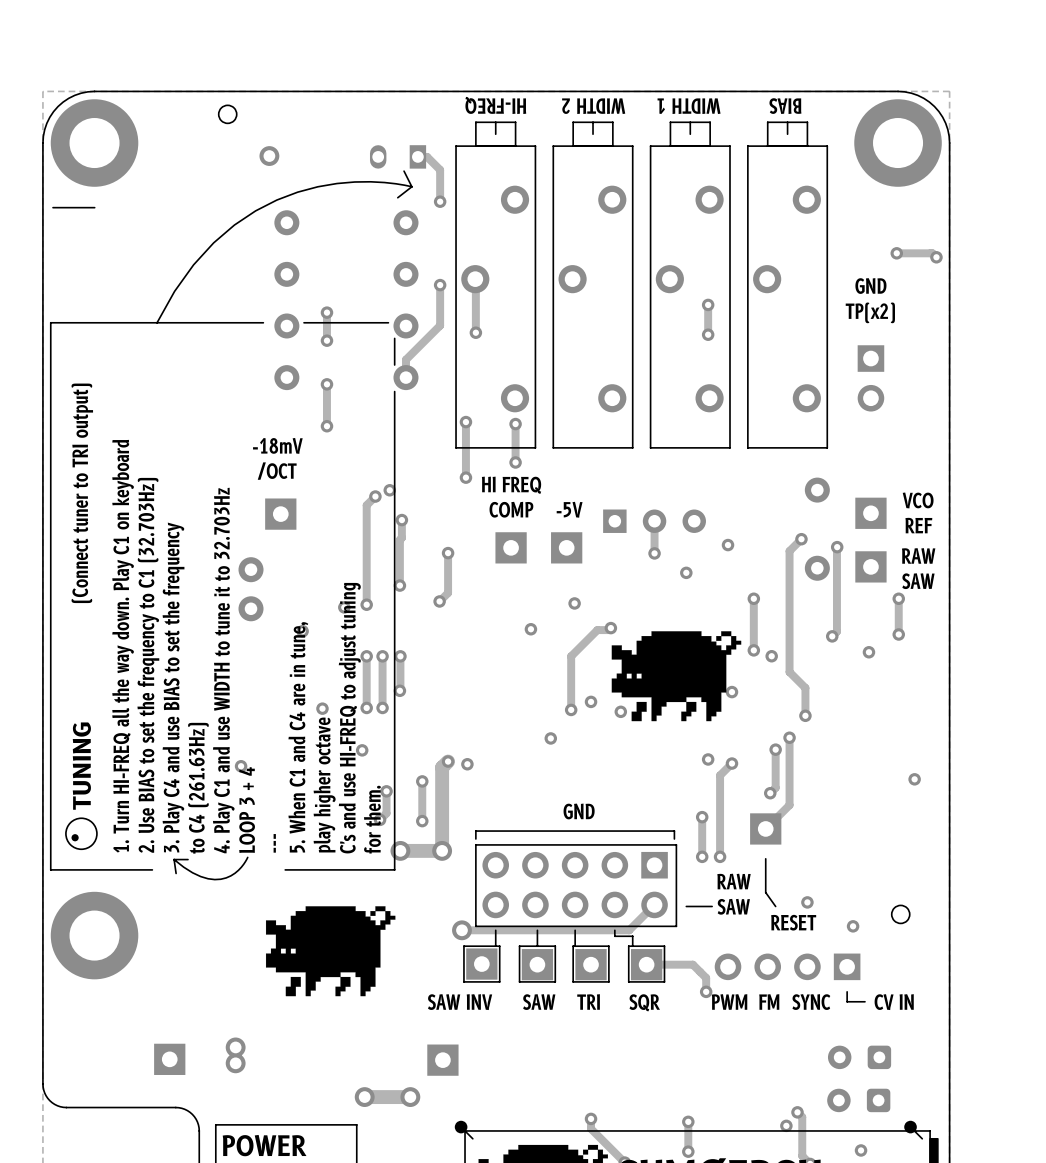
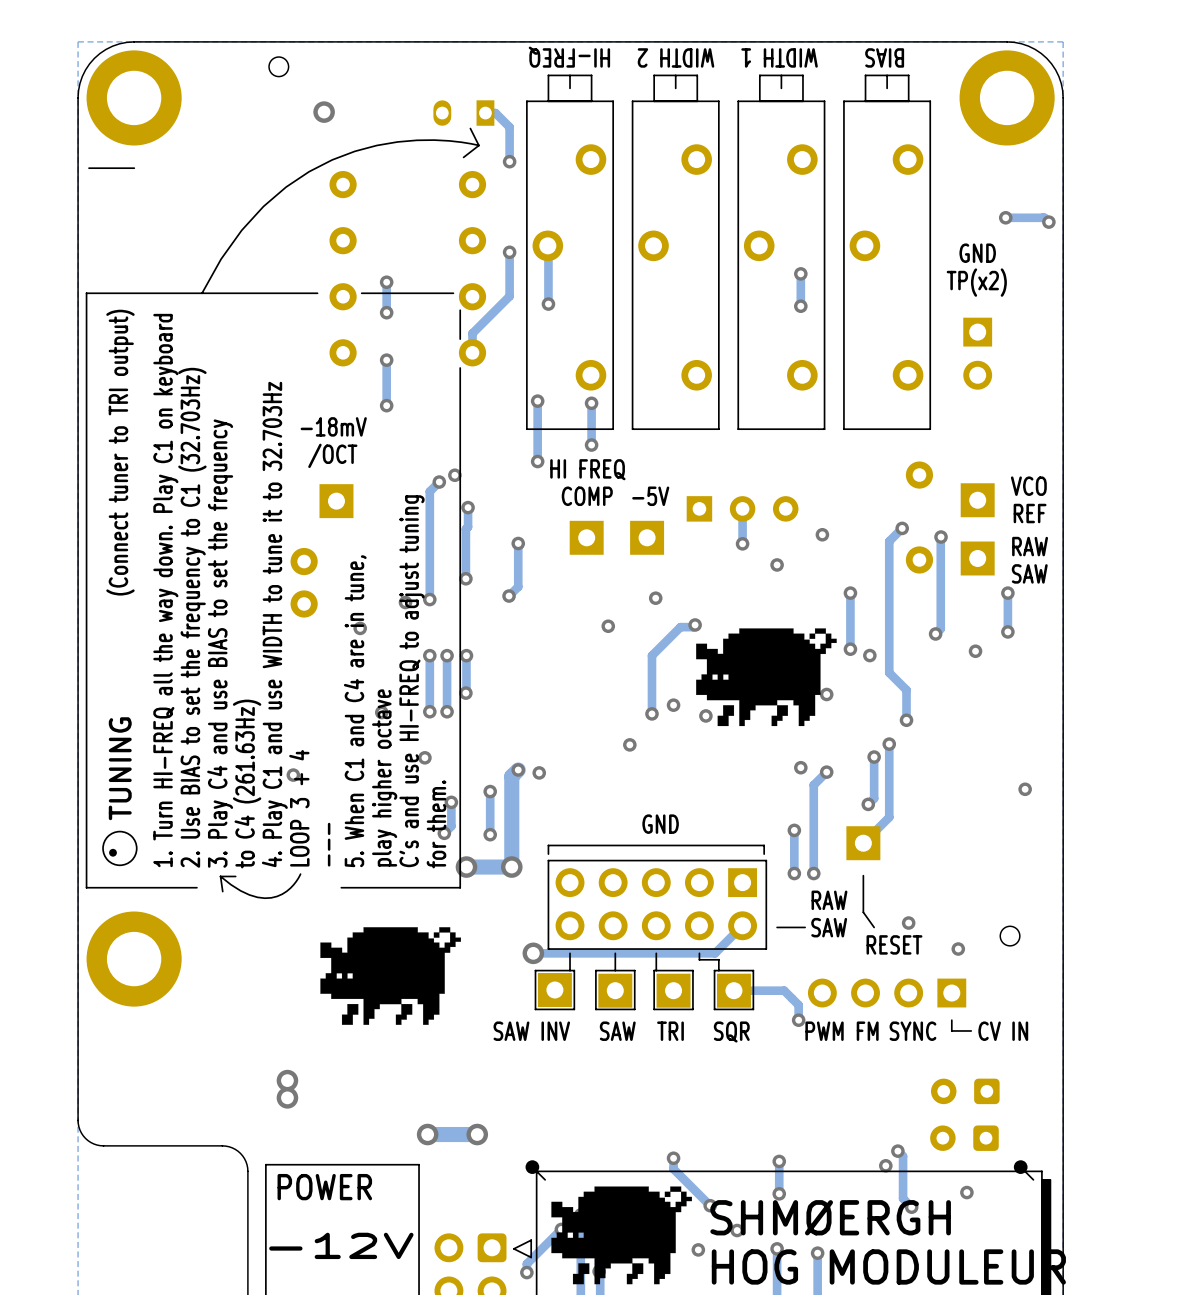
part: (169, 1059) -> none
part: (442, 1060) -> none

